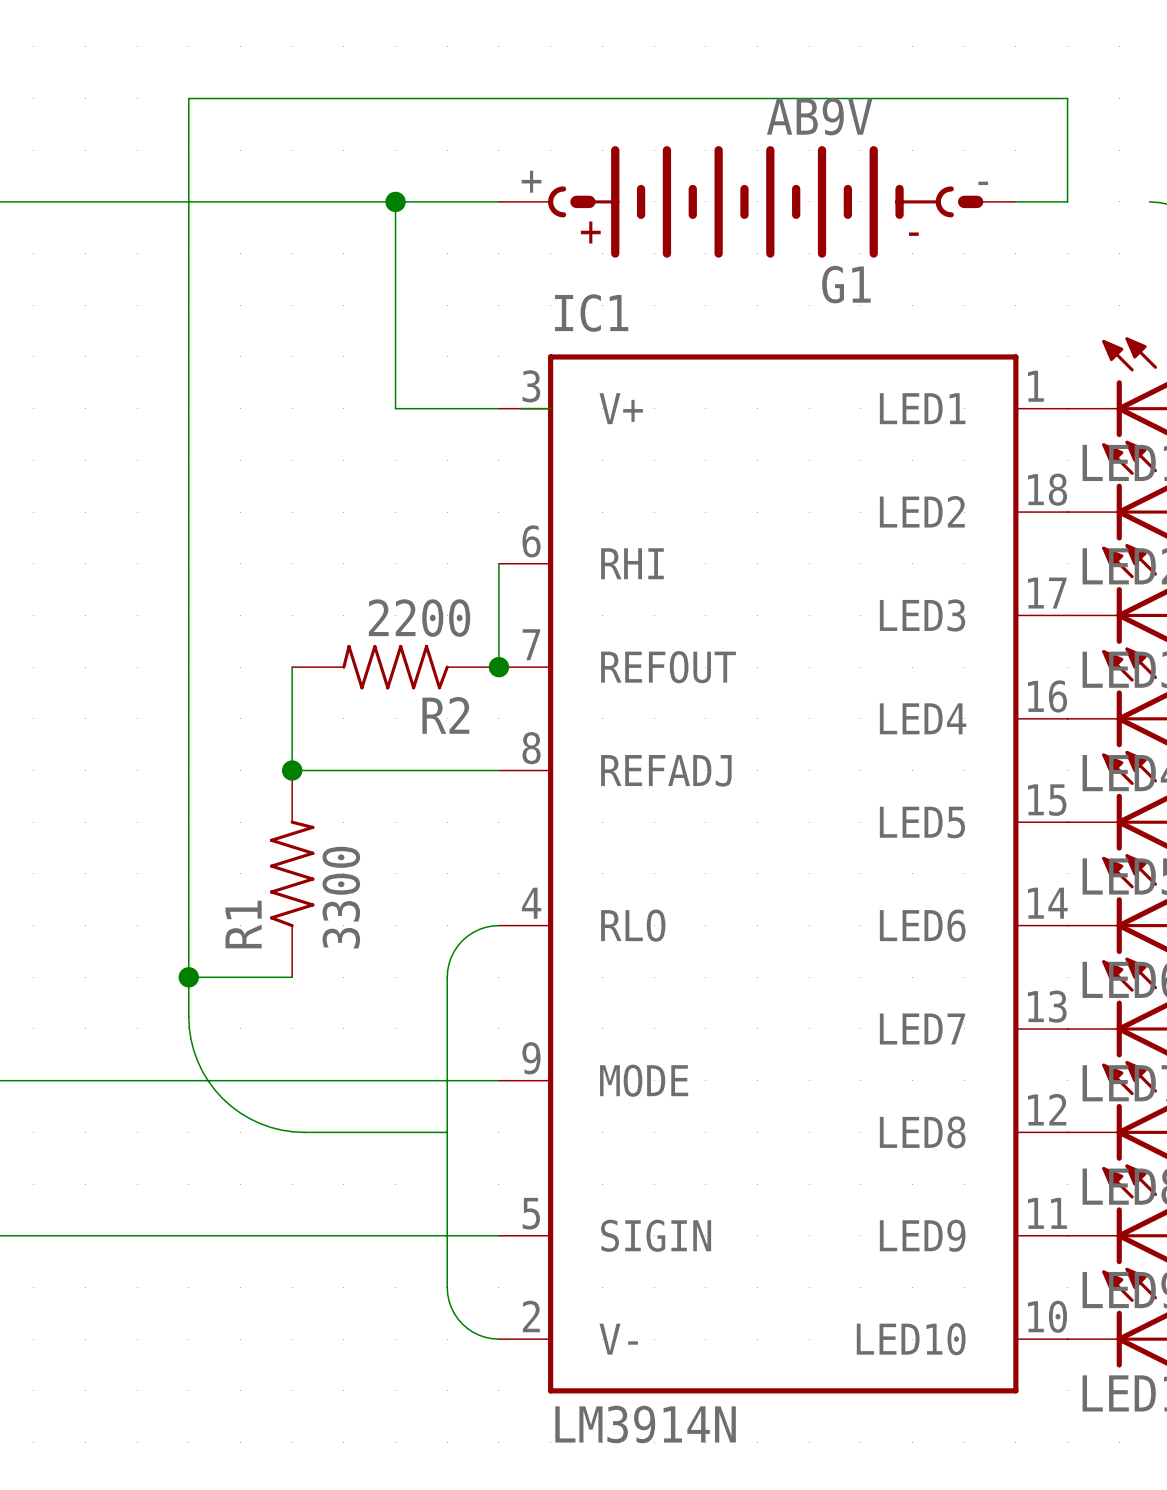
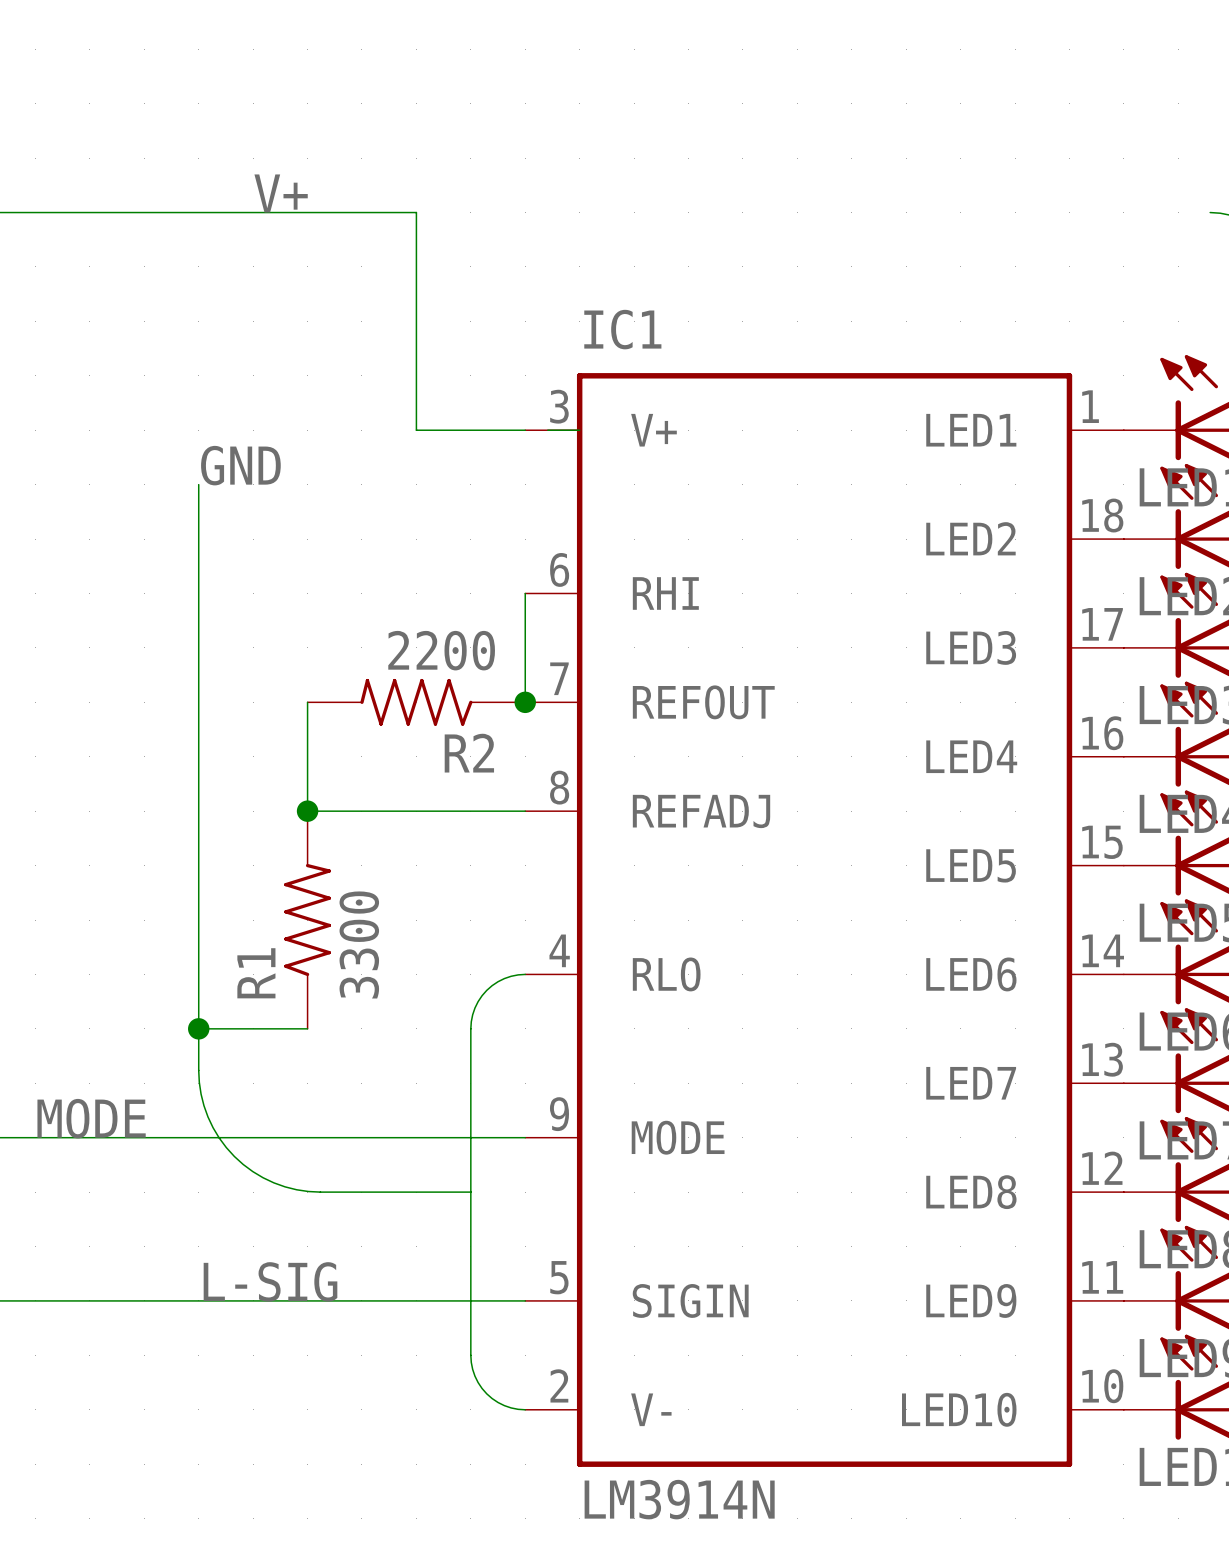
label: none -> V+ (281, 193)
wire: (395, 201) (498, 201) -> none
junction: (395, 201) -> none
G1: AB9V (757, 201) -> none
wire: (1015, 201) (1067, 201) (1067, 98) (188, 98) (188, 460) -> none
label: none -> GND (240, 465)
label: none -> MODE (91, 1118)
label: none -> L-SIG (270, 1281)

